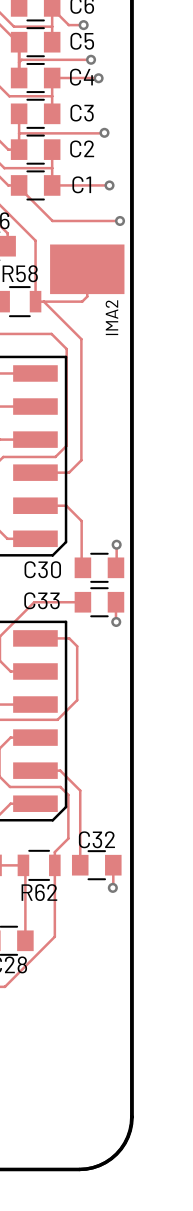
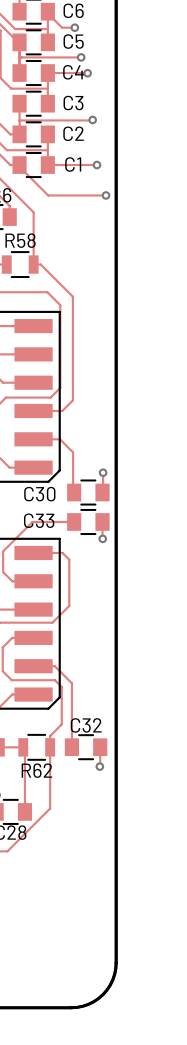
track: (87, 269) (87, 296) (82, 301) (43, 301) -> none
part: (87, 269) -> none
text: IMA2 (111, 317) -> none

